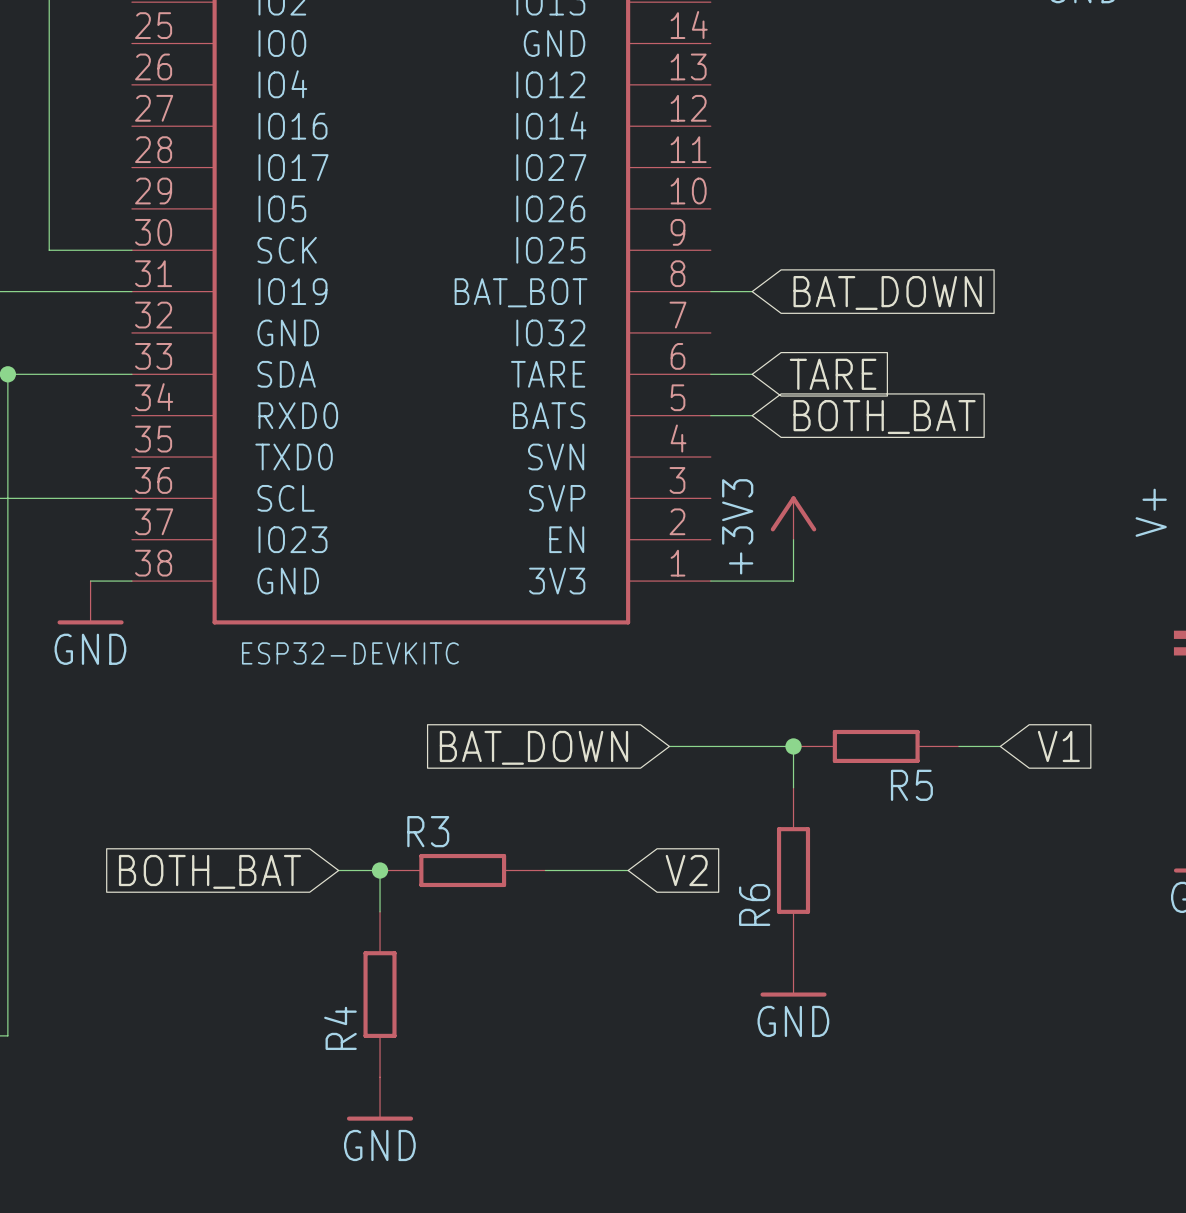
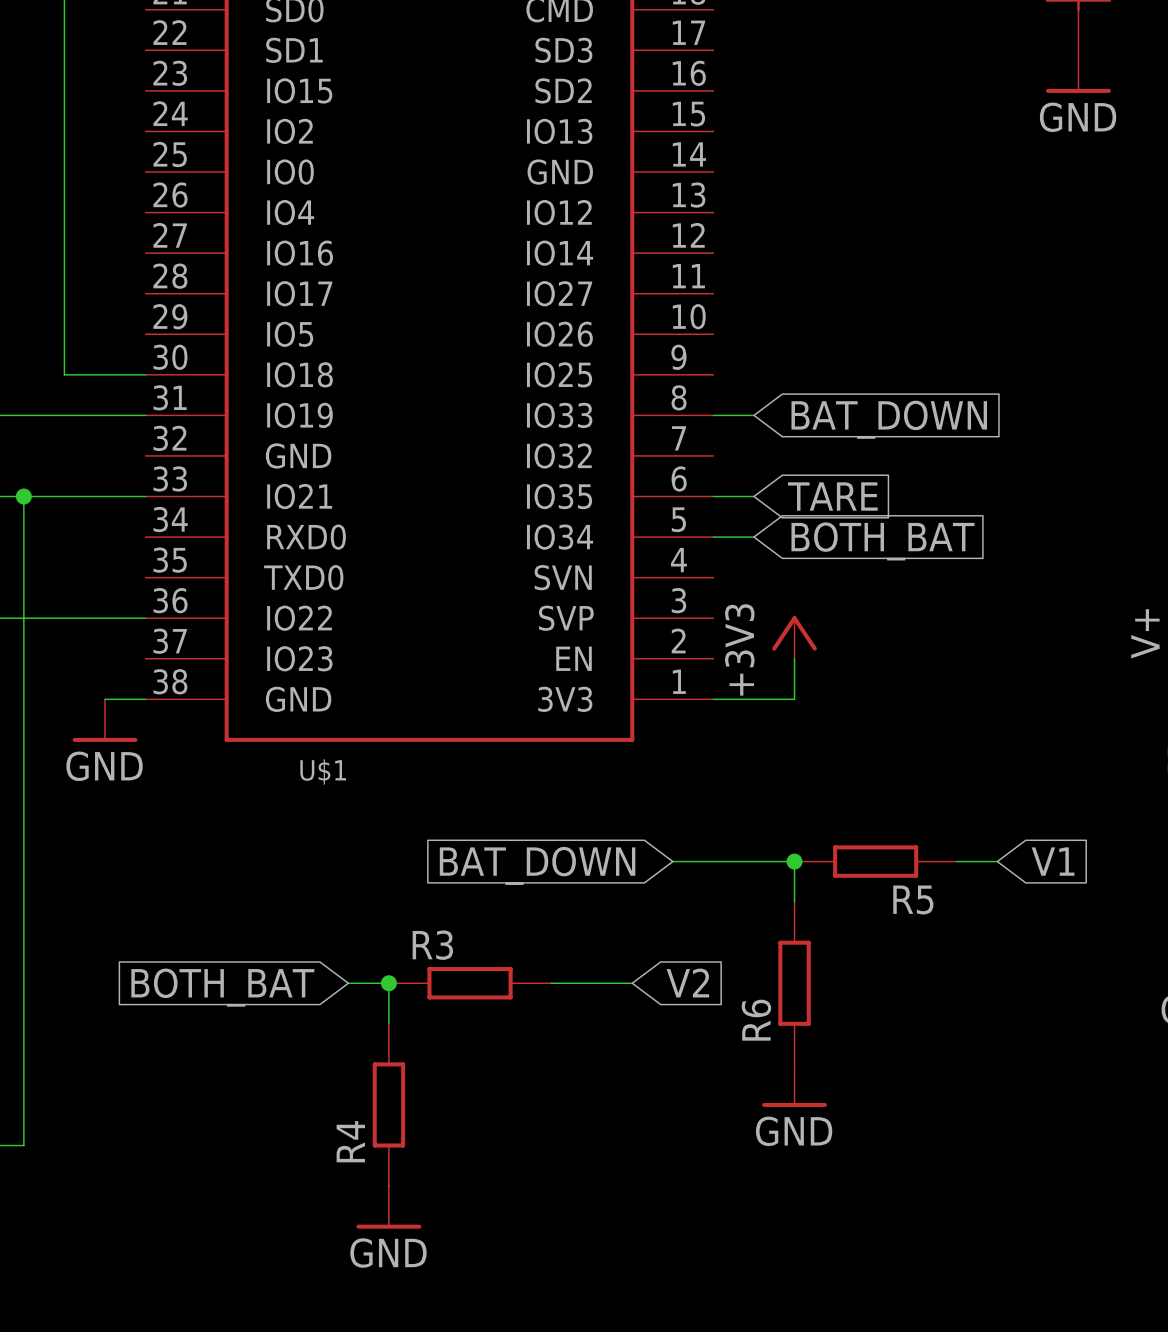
ESP32-DEVKITC pin name: SCK (287, 250) -> IO18 (300, 374)
ESP32-DEVKITC pin name: BAT_BOT (521, 292) -> IO33 (559, 415)
ESP32-DEVKITC pin name: SDA (286, 374) -> IO21 (299, 496)
ESP32-DEVKITC pin name: TARE (548, 374) -> IO35 (559, 496)
ESP32-DEVKITC pin name: BATS (549, 415) -> IO34 (560, 537)
ESP32-DEVKITC pin name: SCL (286, 498) -> IO22 (299, 618)
ESP32-DEVKITC name: ESP32-DEVKITC (350, 653) -> U$1 (323, 771)

